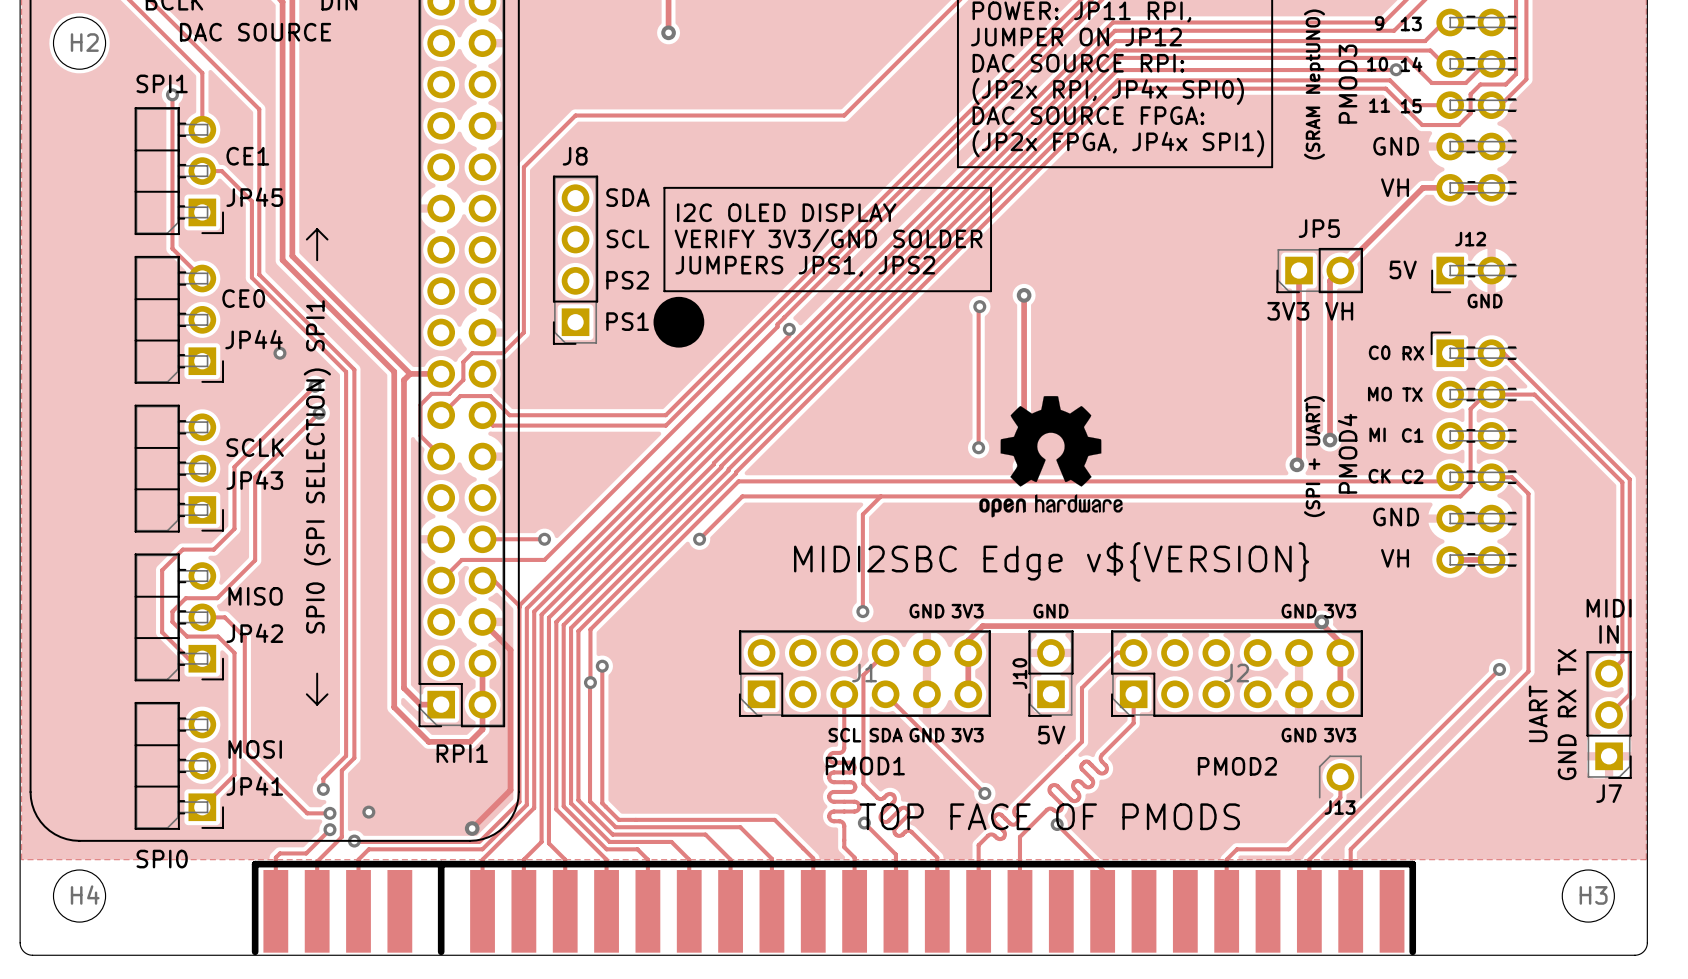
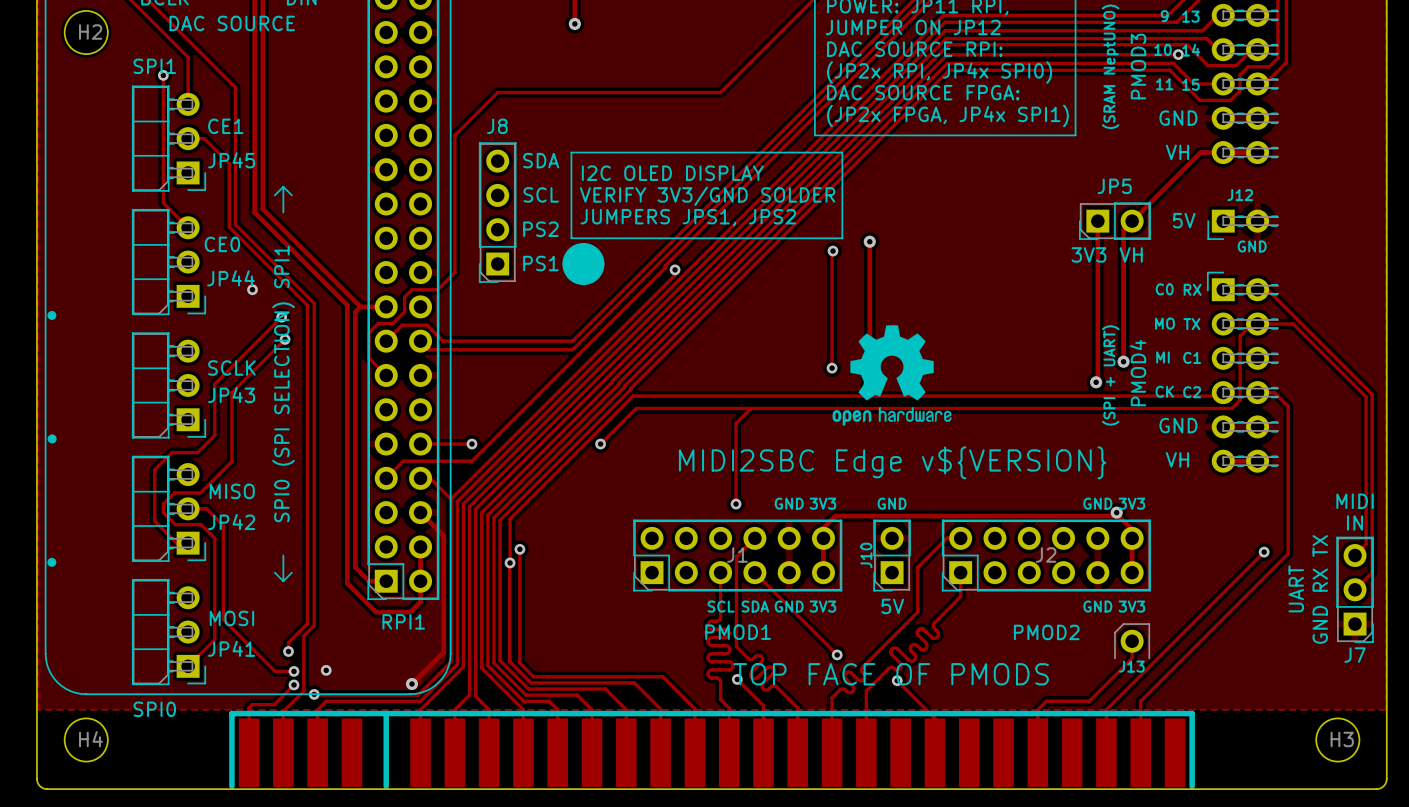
drawing: none -> [47, 310, 57, 320]
drawing: none -> [47, 434, 57, 444]
drawing: none -> [47, 557, 57, 567]

